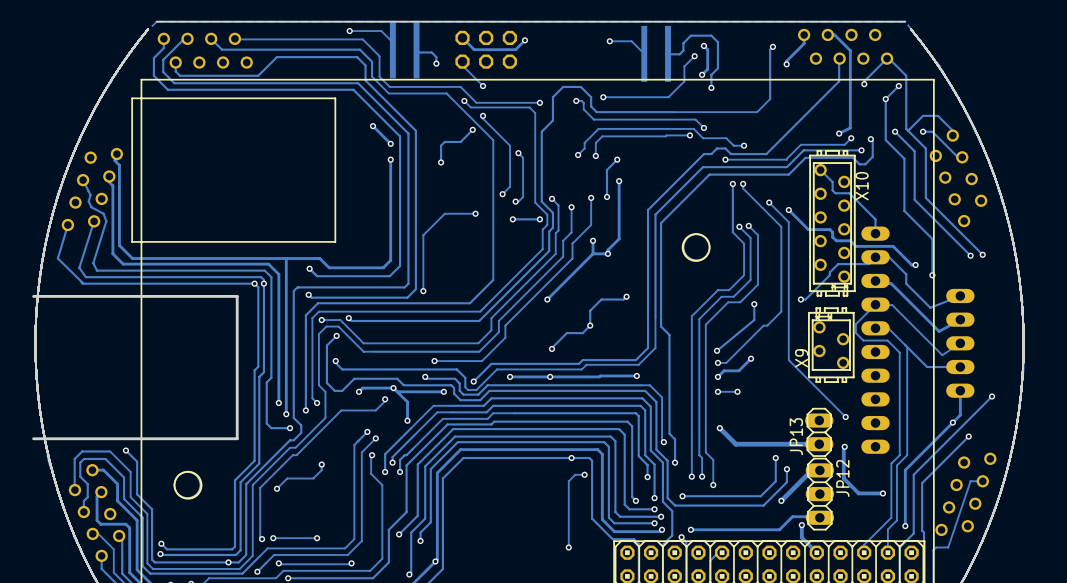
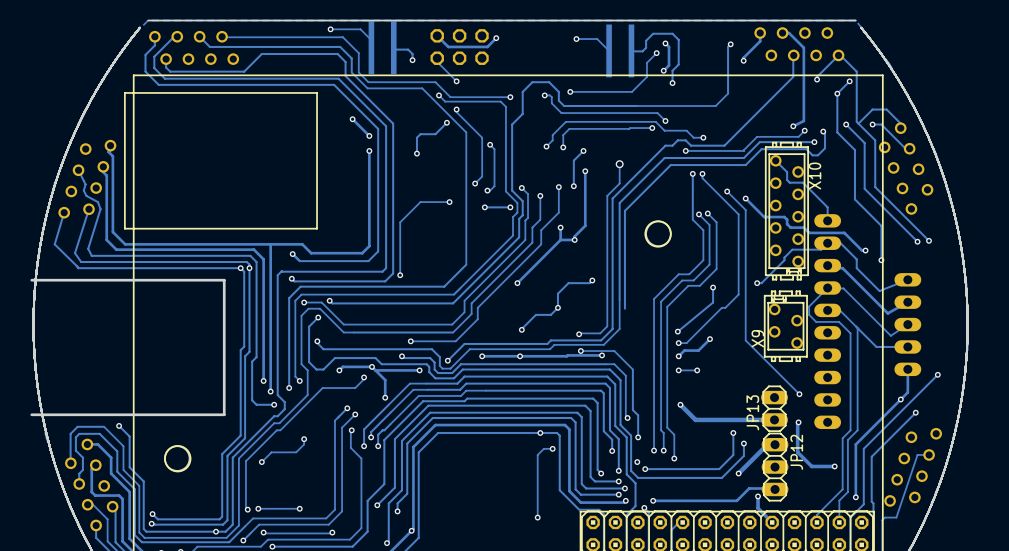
track: none -> (619, 164) (619, 183) (607, 195) (607, 326) (600, 333) (579, 334)
via: none -> (619, 164)
track: (661, 326) (669, 334) (669, 390) -> (580, 351) (614, 351) (632, 369)
via: none -> (579, 334)
via: none -> (580, 351)
via: none -> (637, 462)

